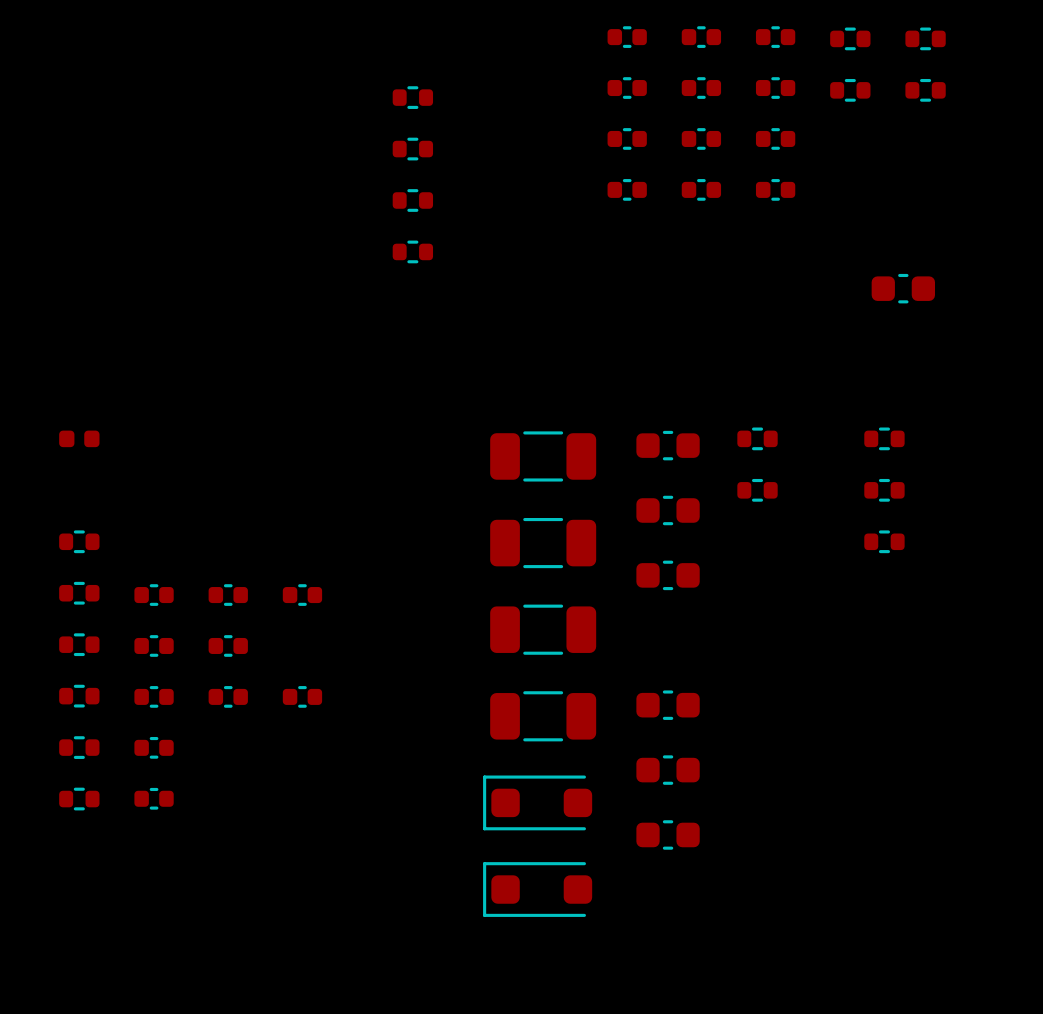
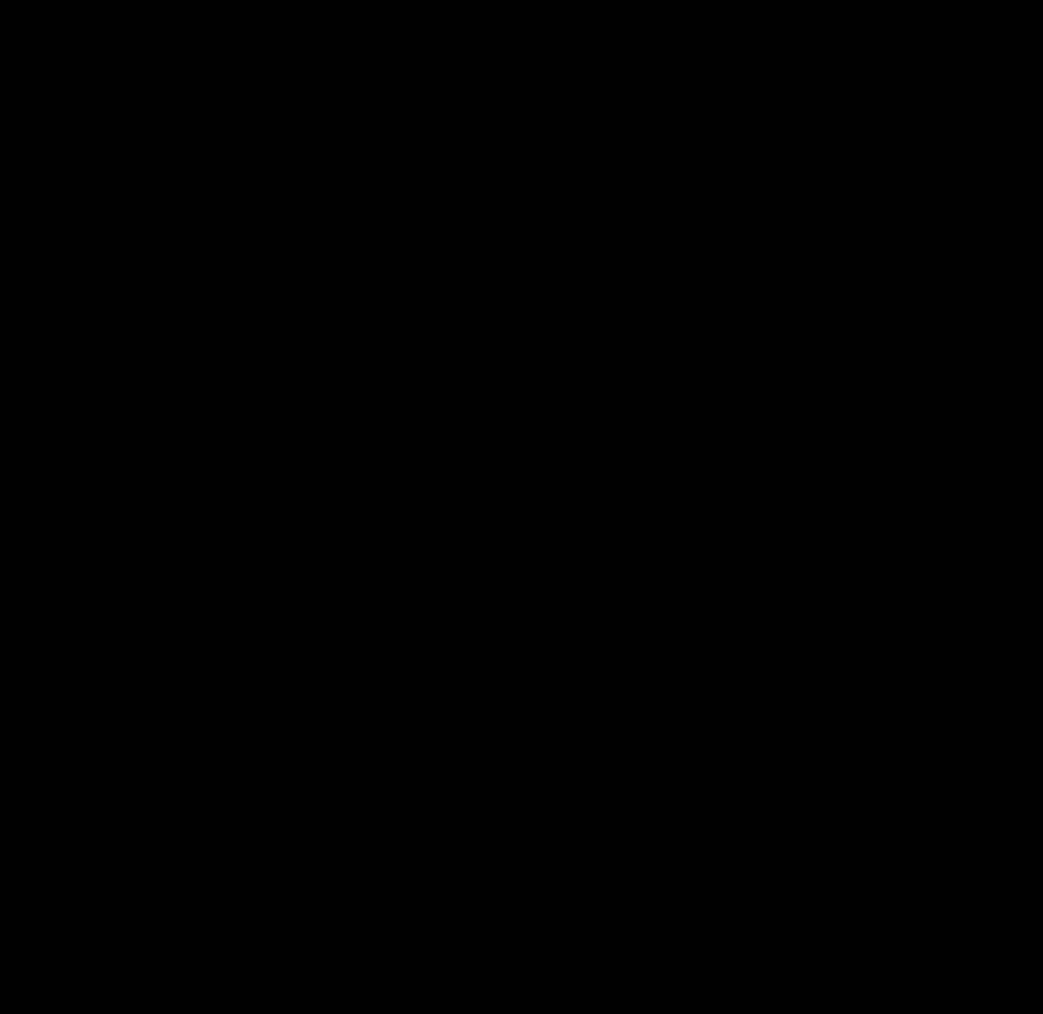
part: (627, 37) -> none
part: (701, 37) -> none
part: (775, 37) -> none
part: (850, 38) -> none
part: (925, 38) -> none
part: (627, 88) -> none
part: (701, 88) -> none
part: (775, 88) -> none
part: (850, 90) -> none
part: (925, 90) -> none
part: (412, 97) -> none
part: (627, 138) -> none
part: (701, 138) -> none
part: (775, 138) -> none
part: (412, 149) -> none
part: (627, 189) -> none
part: (701, 189) -> none
part: (775, 189) -> none
part: (412, 200) -> none
part: (412, 251) -> none
part: (903, 288) -> none
part: (79, 438) -> none
part: (757, 438) -> none
part: (884, 438) -> none
part: (668, 445) -> none
part: (543, 456) -> none
part: (757, 490) -> none
part: (884, 490) -> none
part: (668, 510) -> none
part: (79, 541) -> none
part: (884, 541) -> none
part: (543, 543) -> none
part: (668, 575) -> none
part: (79, 593) -> none
part: (154, 595) -> none
part: (228, 595) -> none
part: (302, 595) -> none
part: (543, 629) -> none
part: (79, 644) -> none
part: (154, 645) -> none
part: (228, 645) -> none
part: (79, 696) -> none
part: (154, 696) -> none
part: (228, 696) -> none
part: (302, 696) -> none
part: (668, 705) -> none
part: (543, 716) -> none
part: (79, 747) -> none
part: (154, 747) -> none
part: (668, 770) -> none
part: (154, 798) -> none
part: (79, 799) -> none
part: (537, 802) -> none
part: (668, 834) -> none
part: (537, 889) -> none

